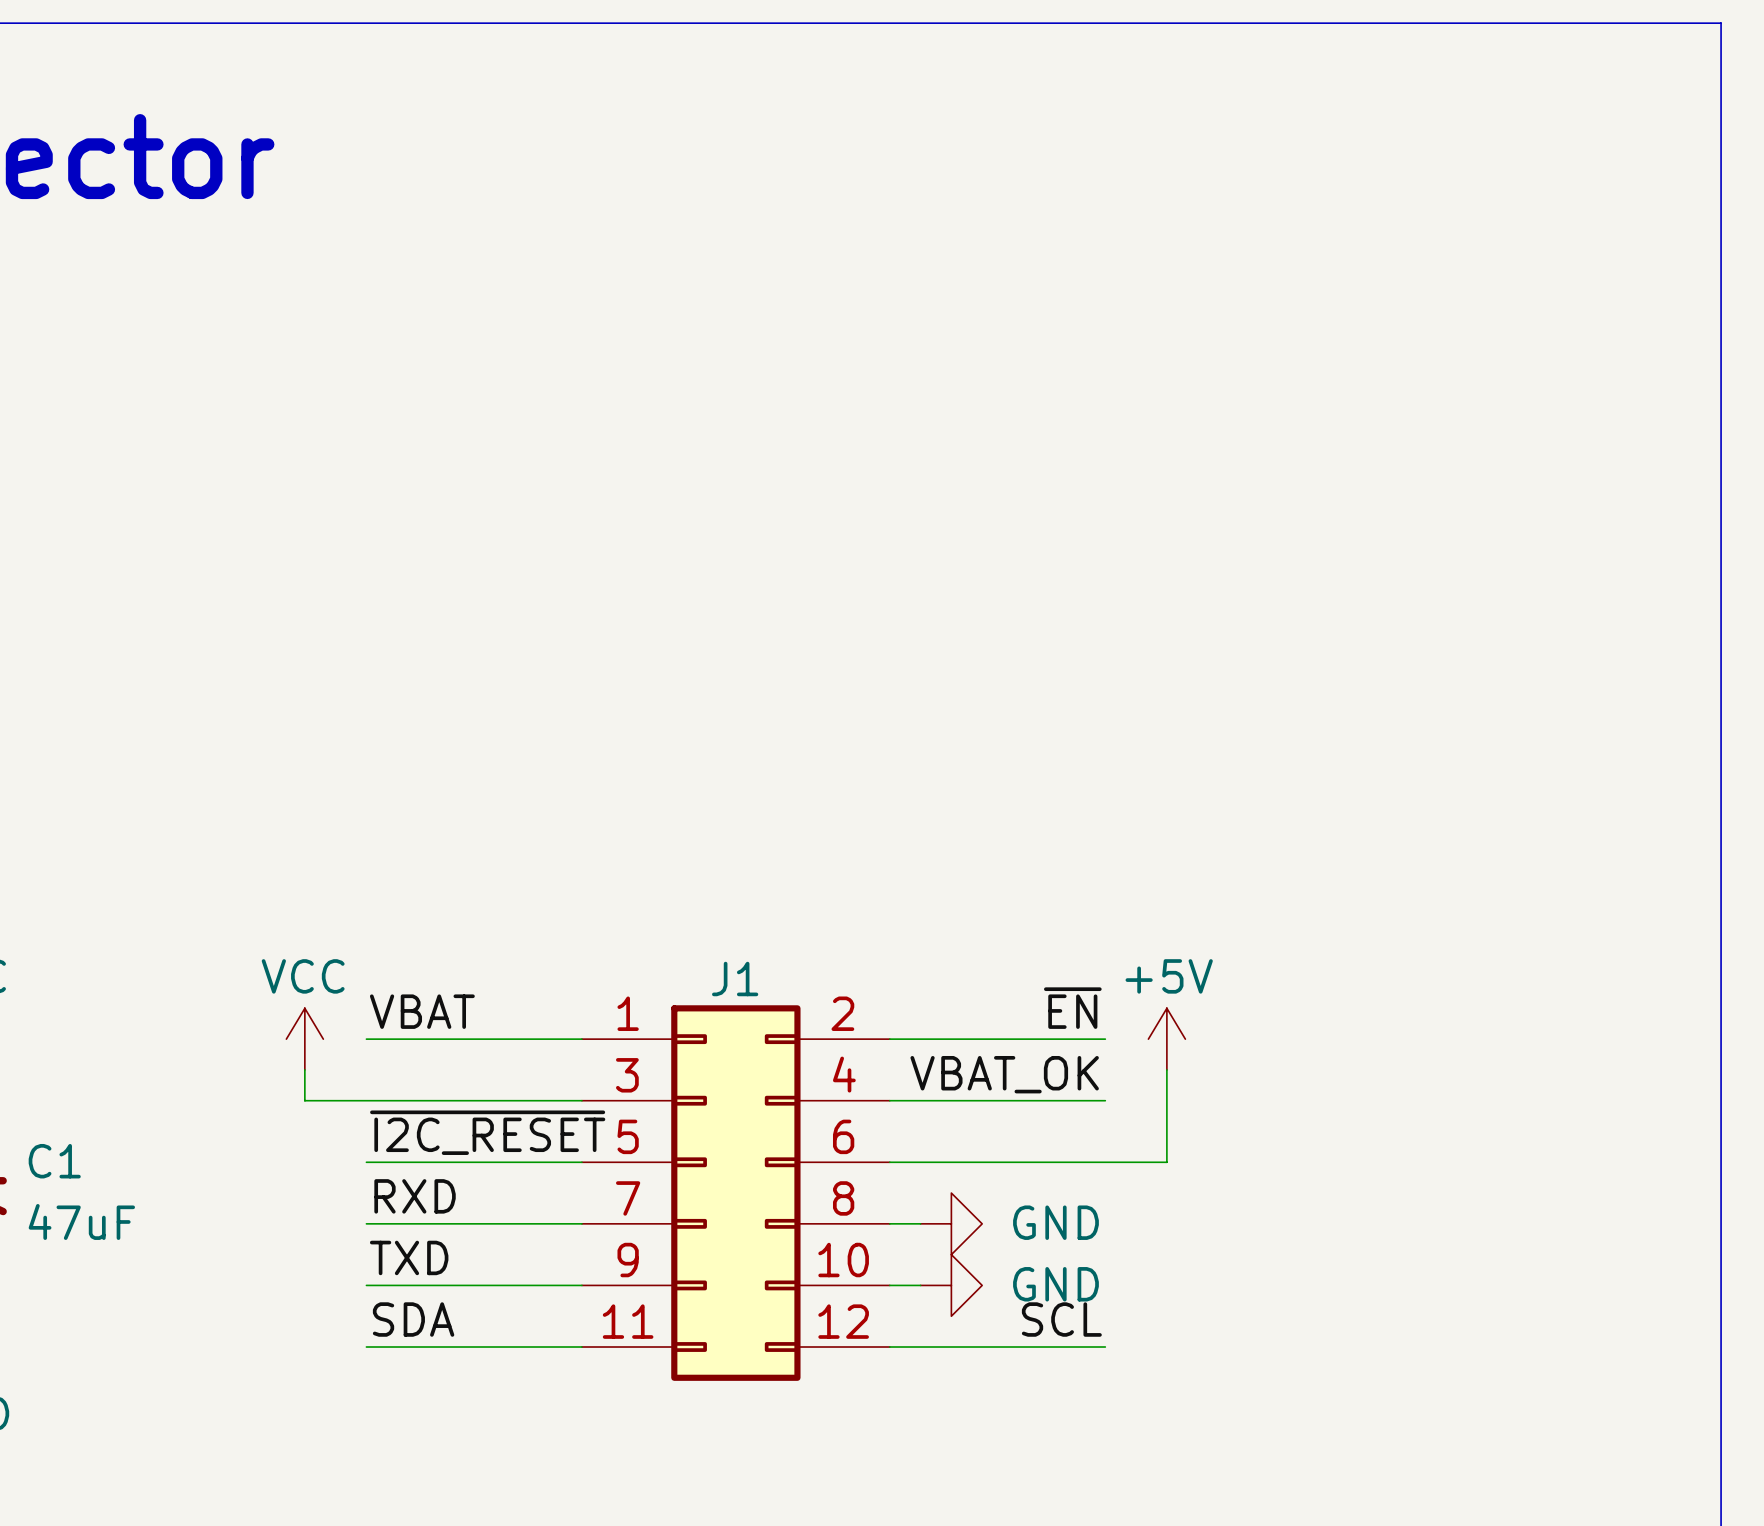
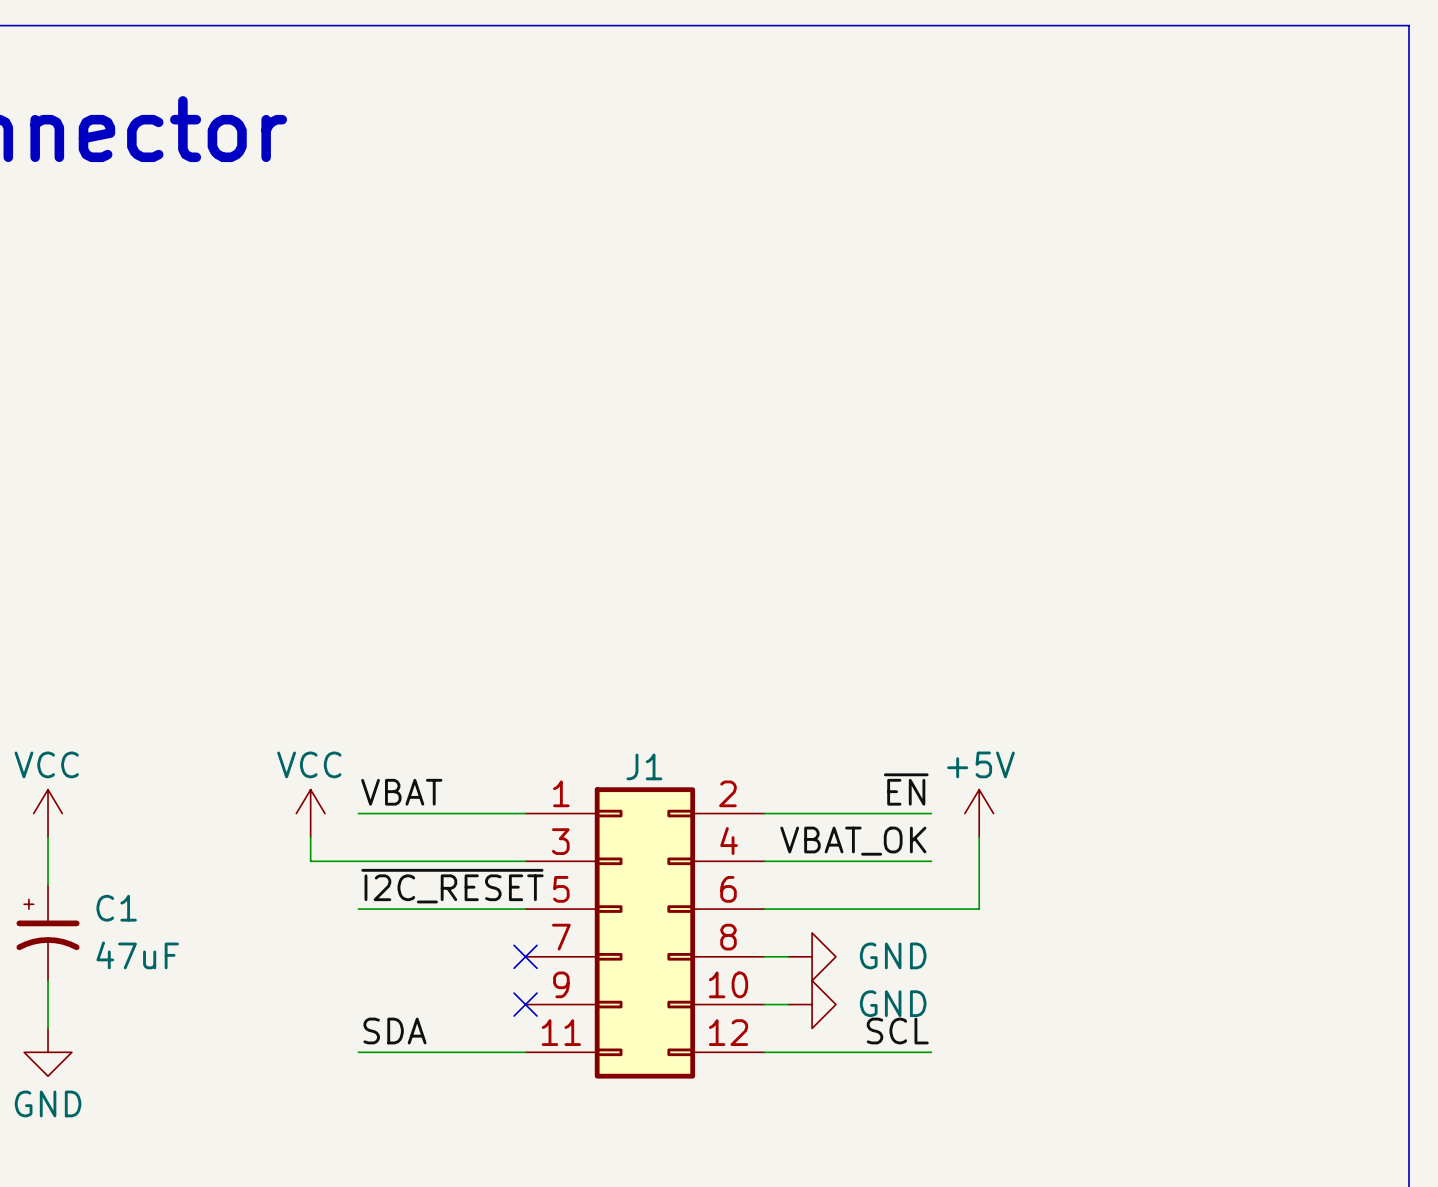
label: RXD (415, 1196) -> none
wire: (366, 1223) (581, 1223) -> none
no-connect mark: none -> (525, 956)
label: TXD (409, 1257) -> none
wire: (366, 1285) (581, 1285) -> none
no-connect mark: none -> (525, 1004)

